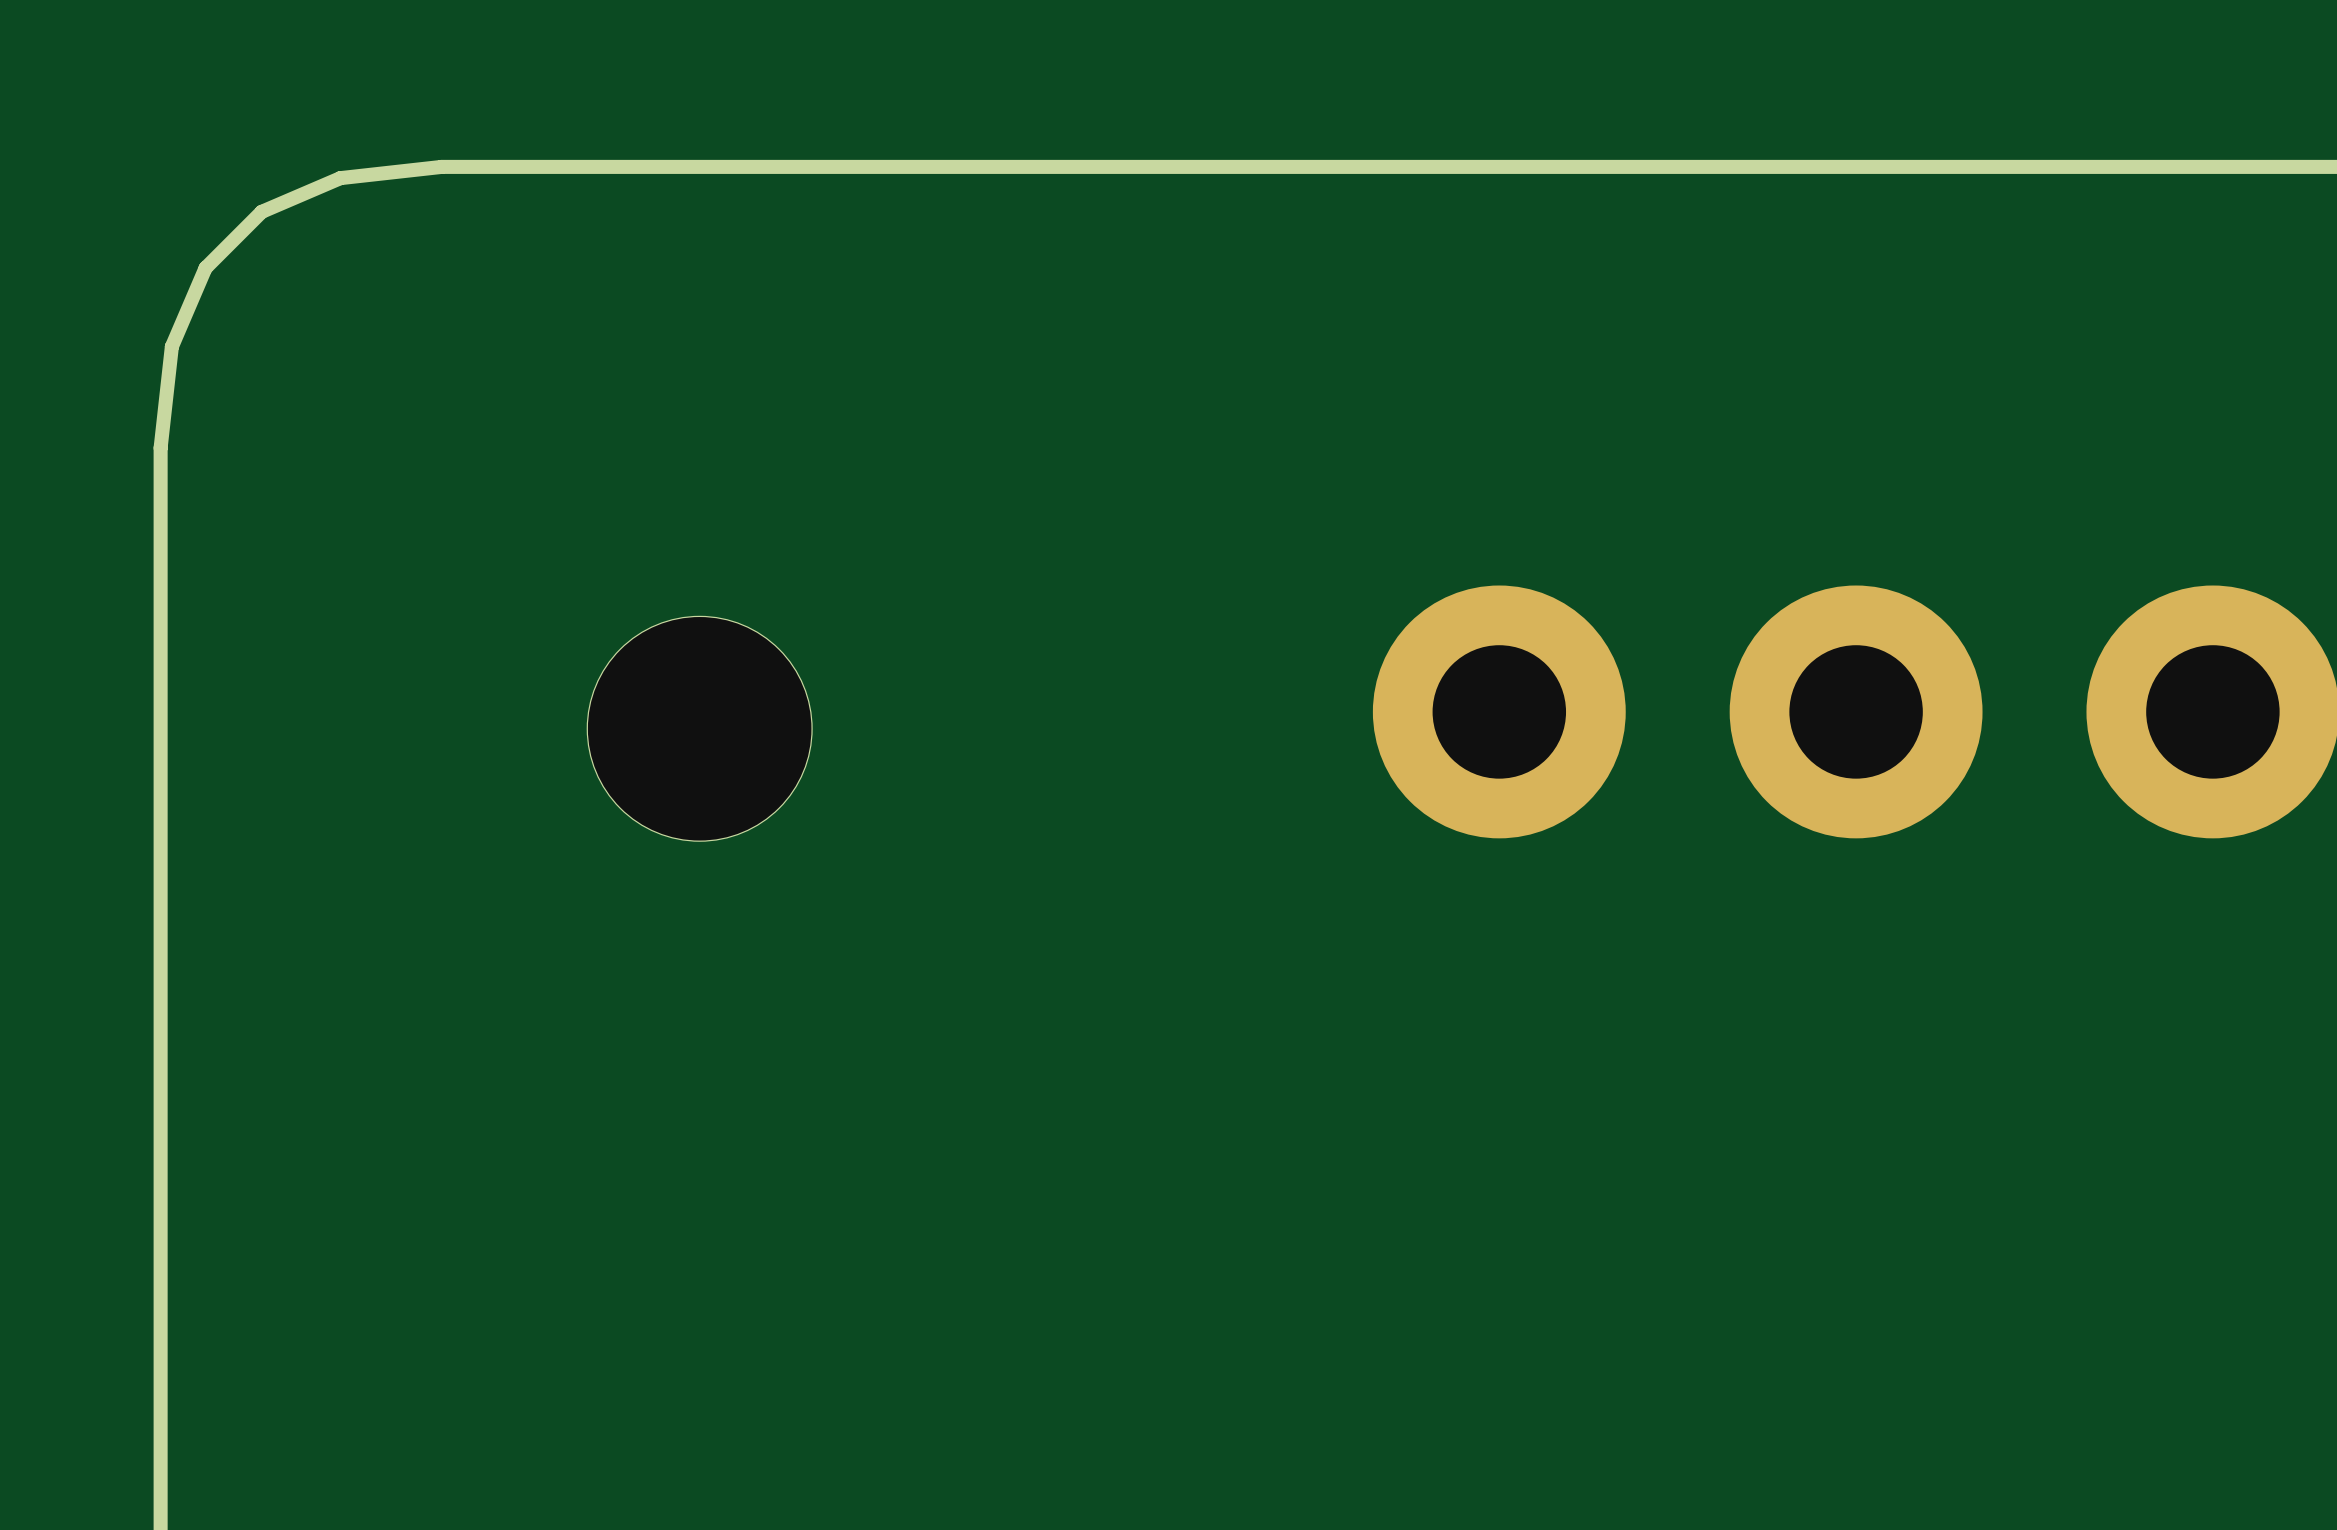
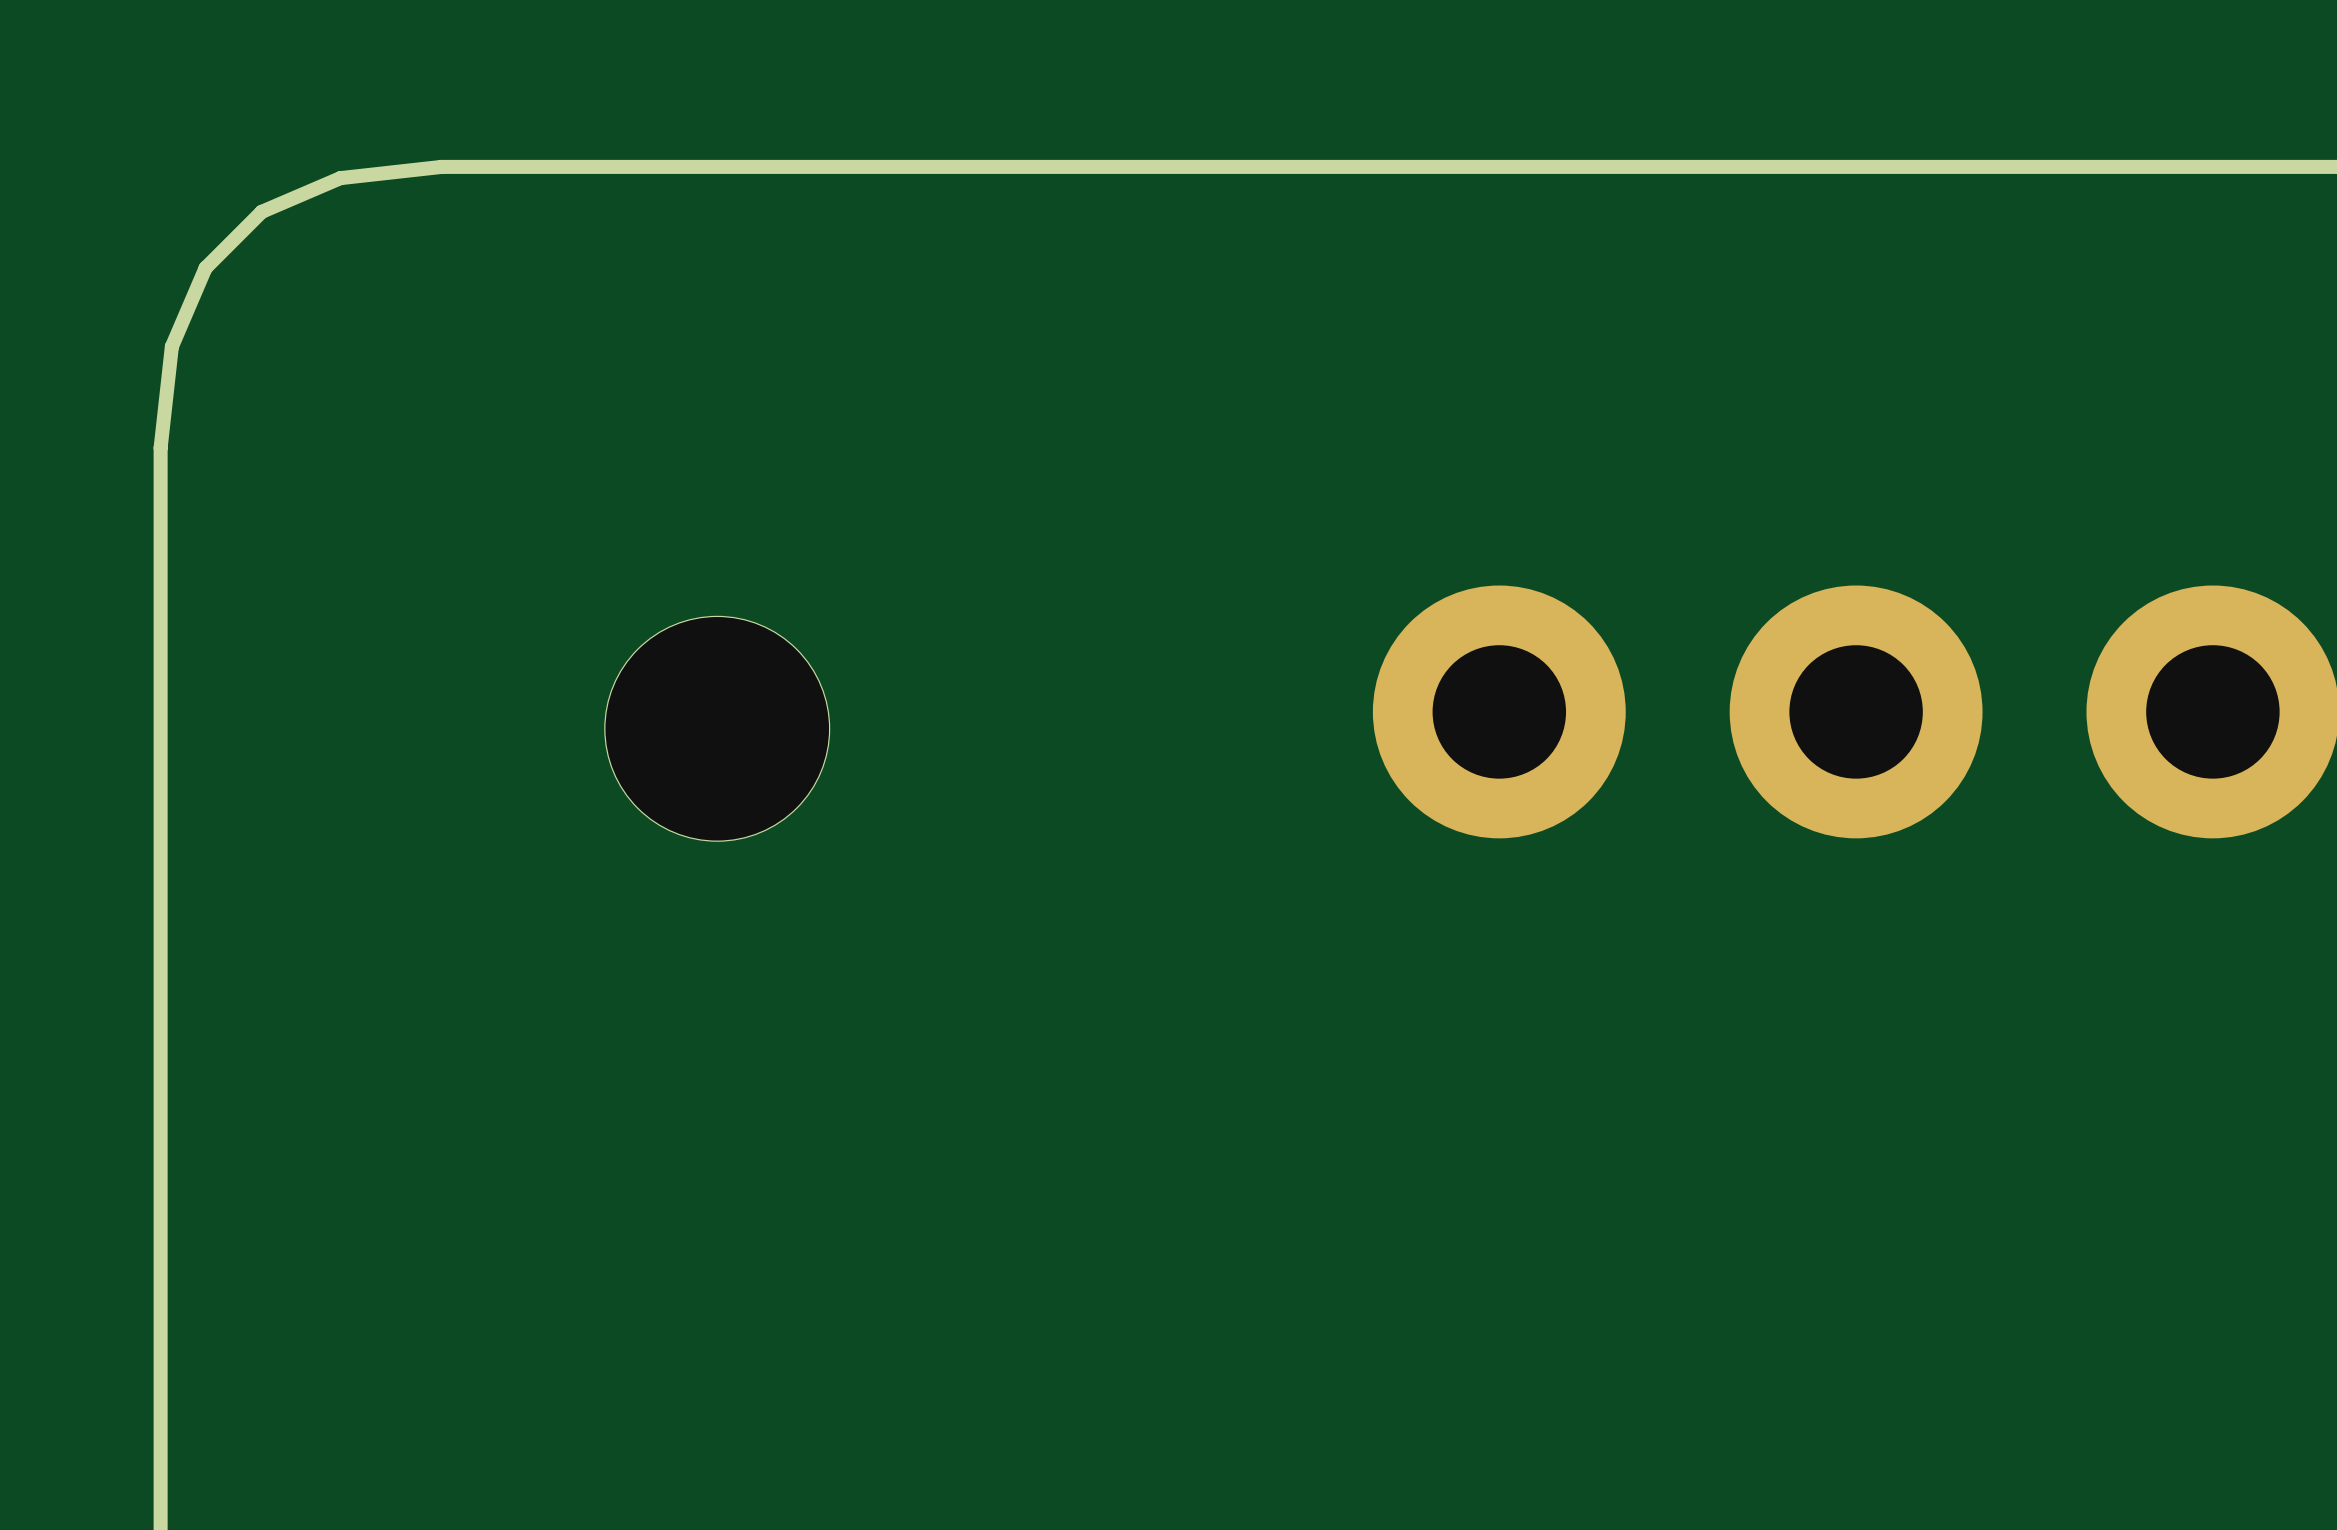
part position: (699, 728) -> (717, 728)

